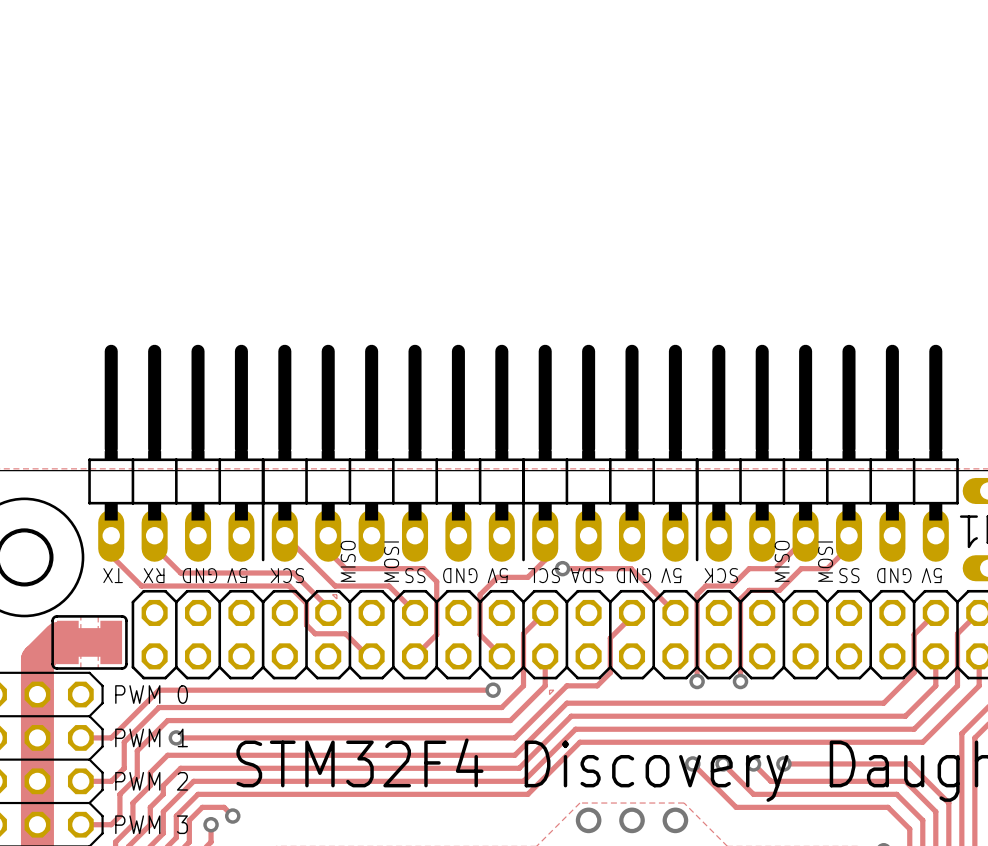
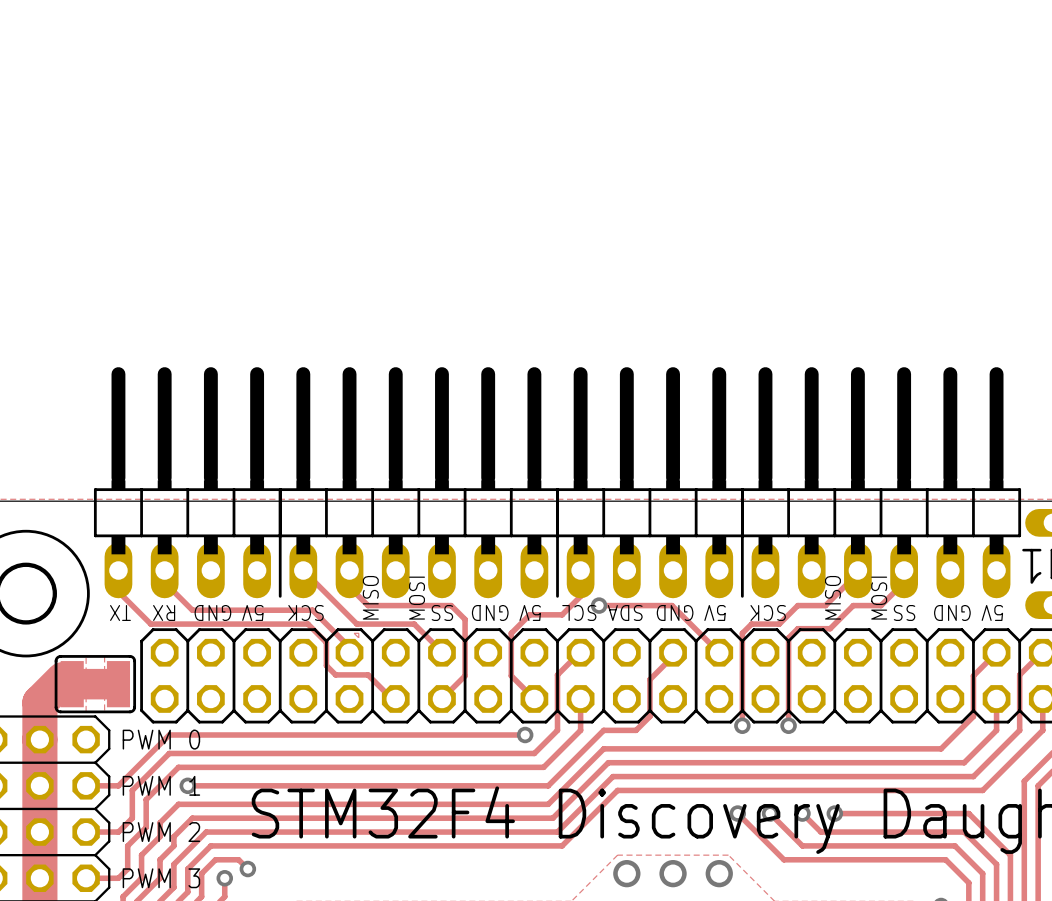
zone outline: (549, 690) (553, 690) (549, 694) (549, 690) -> none

